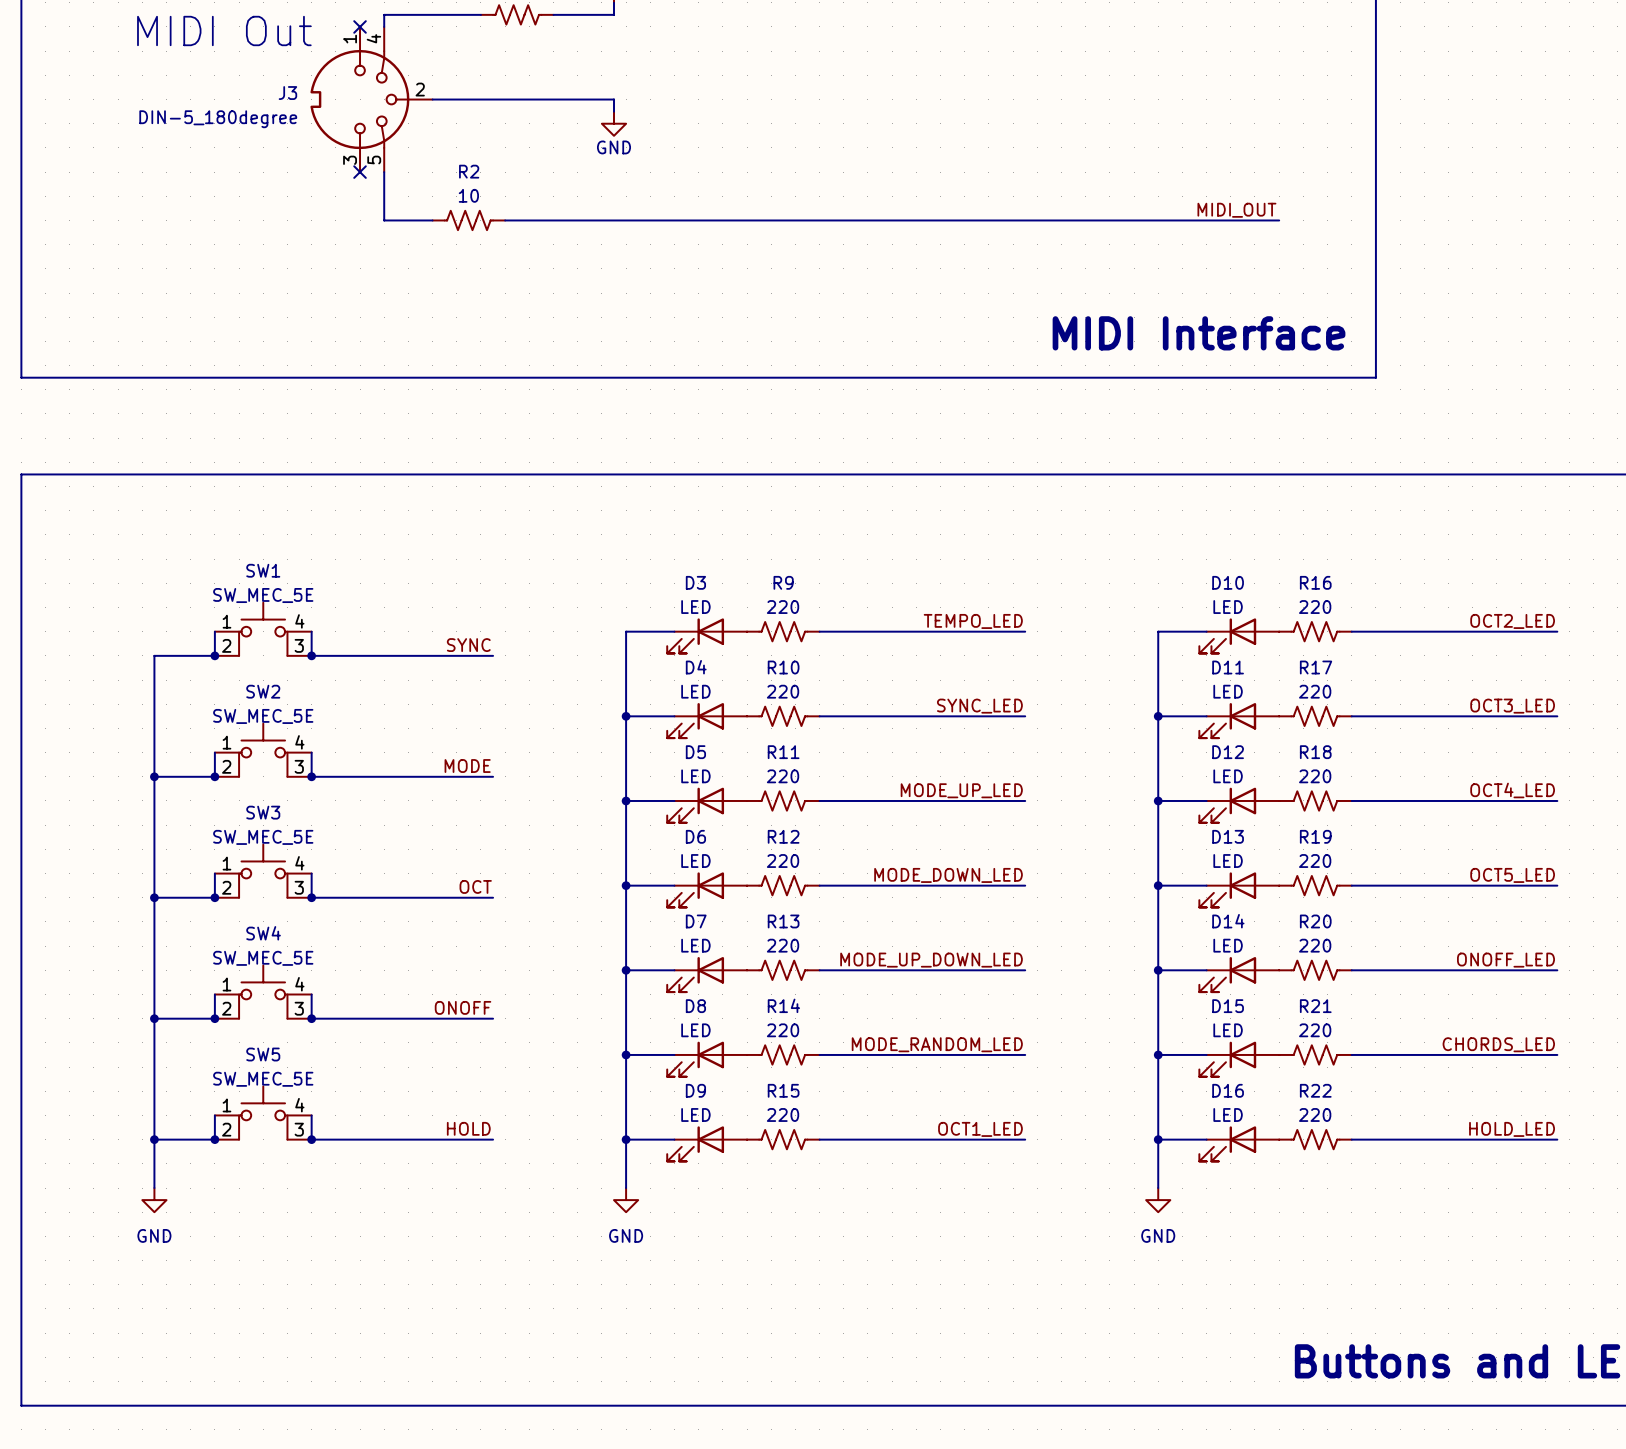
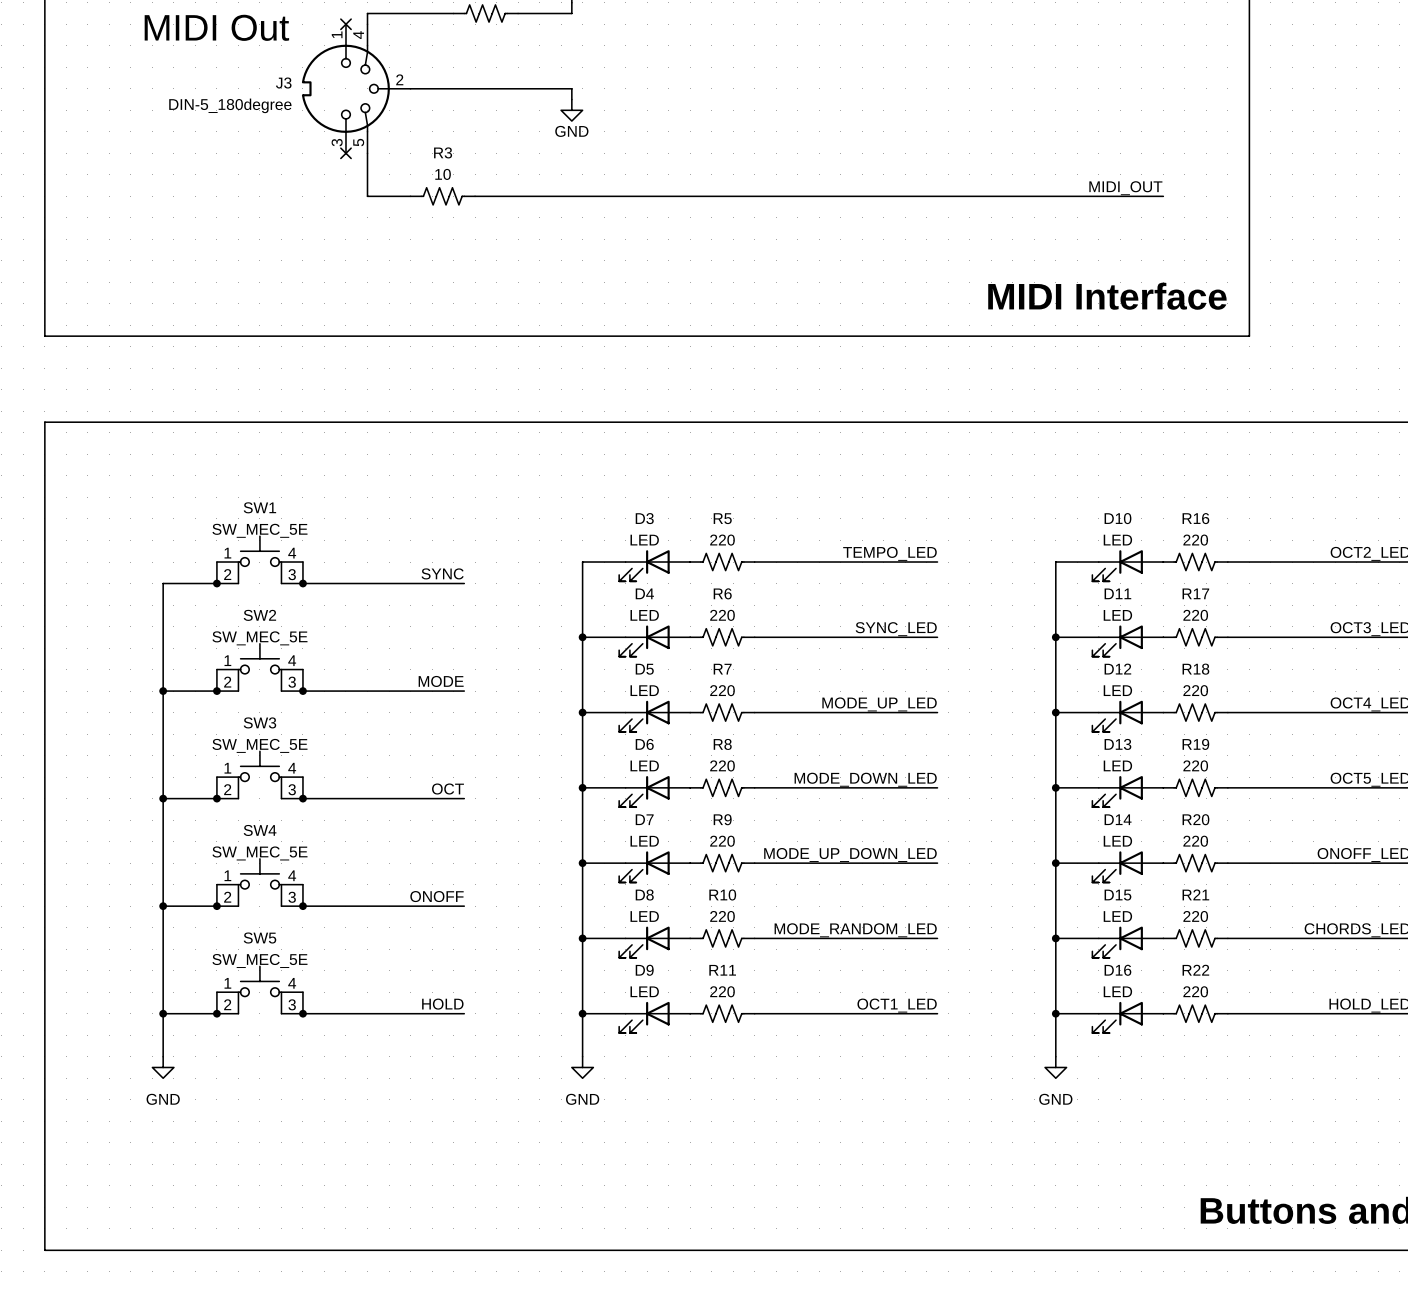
R2 name: R2 (469, 171) -> R3 (443, 152)
R9 name: R9 (783, 582) -> R5 (722, 518)
R10 name: R10 (783, 667) -> R6 (722, 593)
R11 name: R11 (783, 752) -> R7 (722, 669)
R12 name: R12 (783, 836) -> R8 (722, 744)
R13 name: R13 (783, 921) -> R9 (722, 819)
R14 name: R14 (783, 1005) -> R10 (722, 895)
R15 name: R15 (783, 1090) -> R11 (722, 970)

